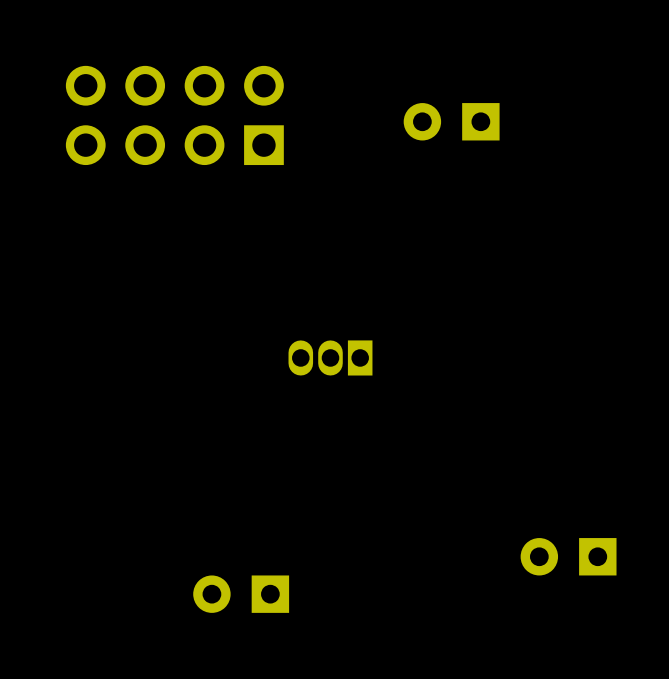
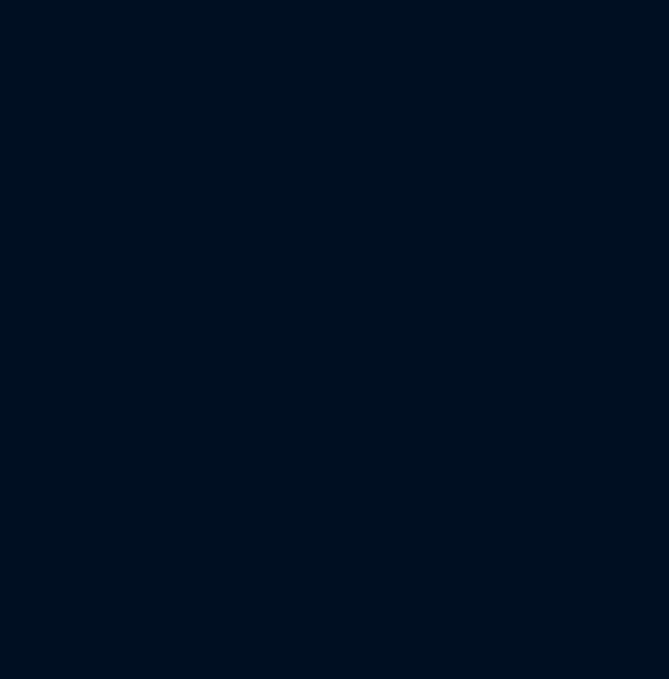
part: (174, 115) -> none
part: (451, 121) -> none
part: (330, 357) -> none
part: (568, 556) -> none
part: (241, 594) -> none

